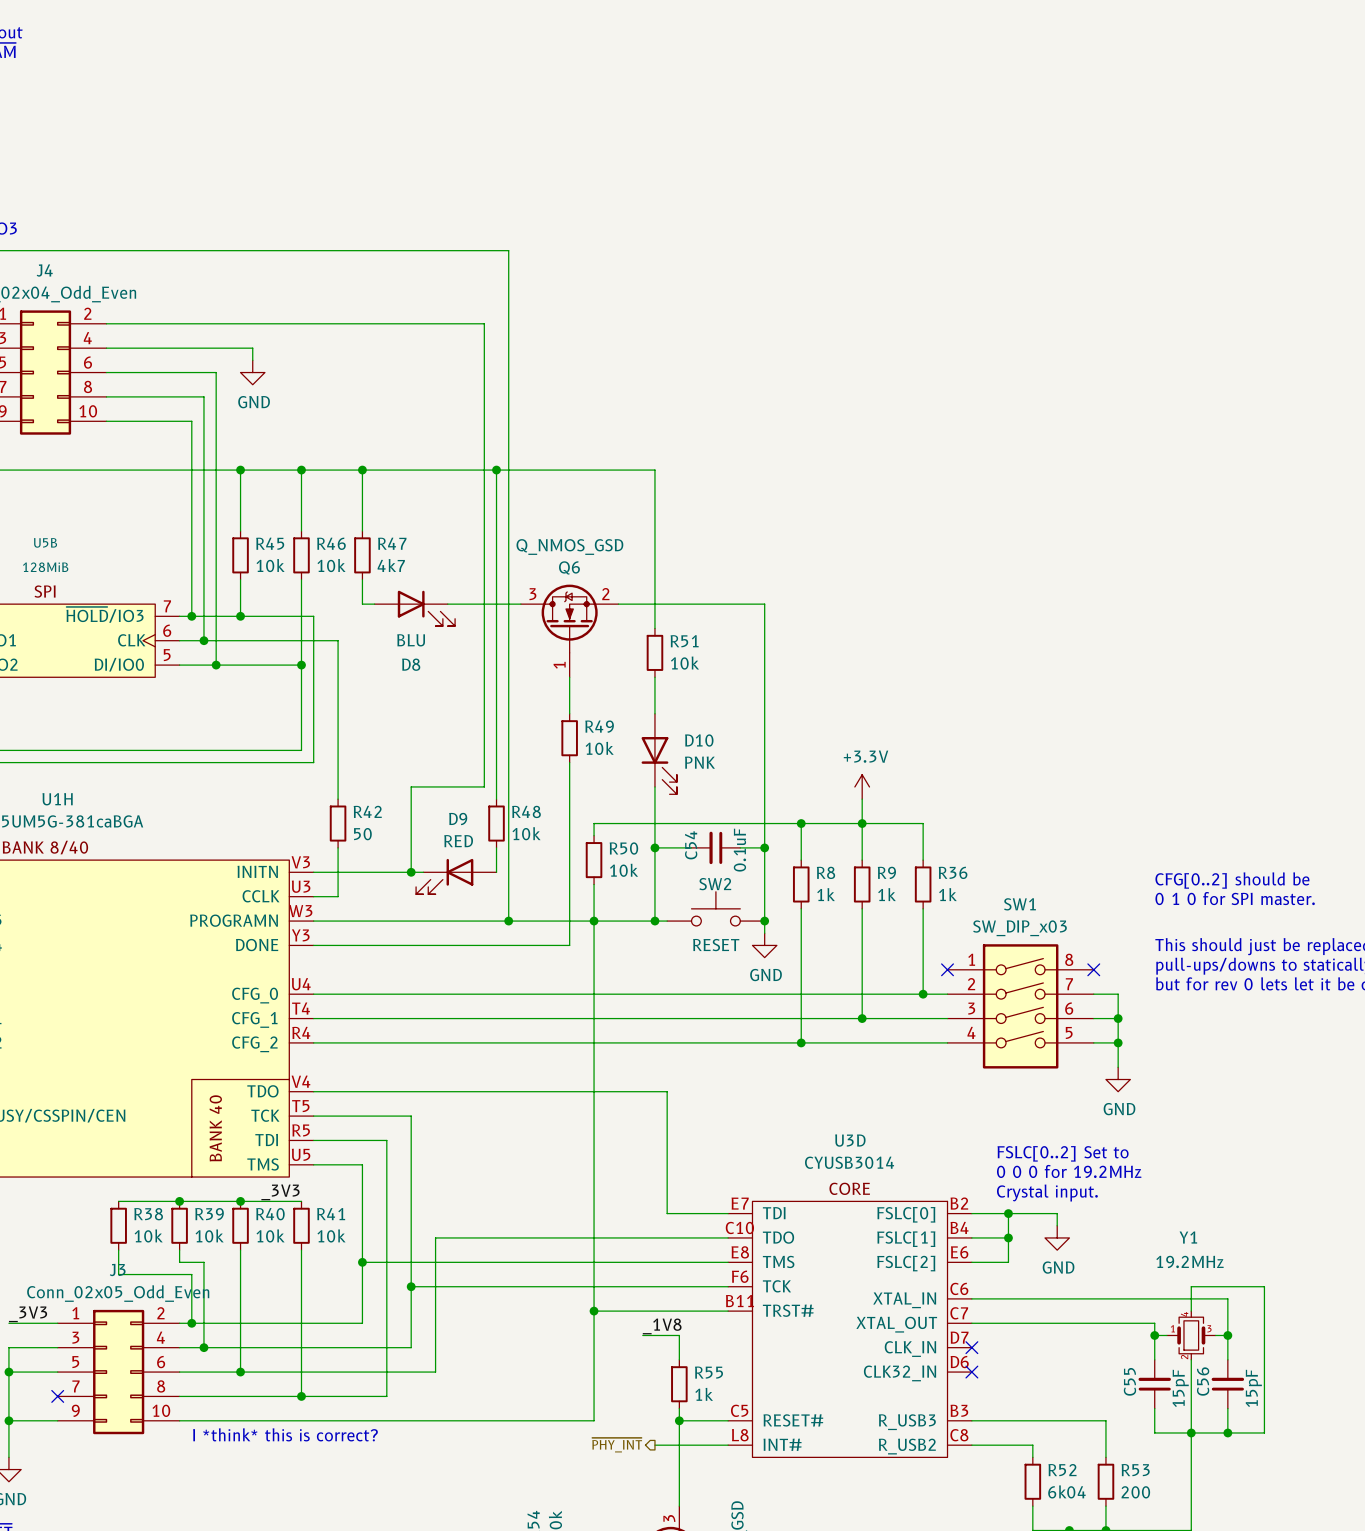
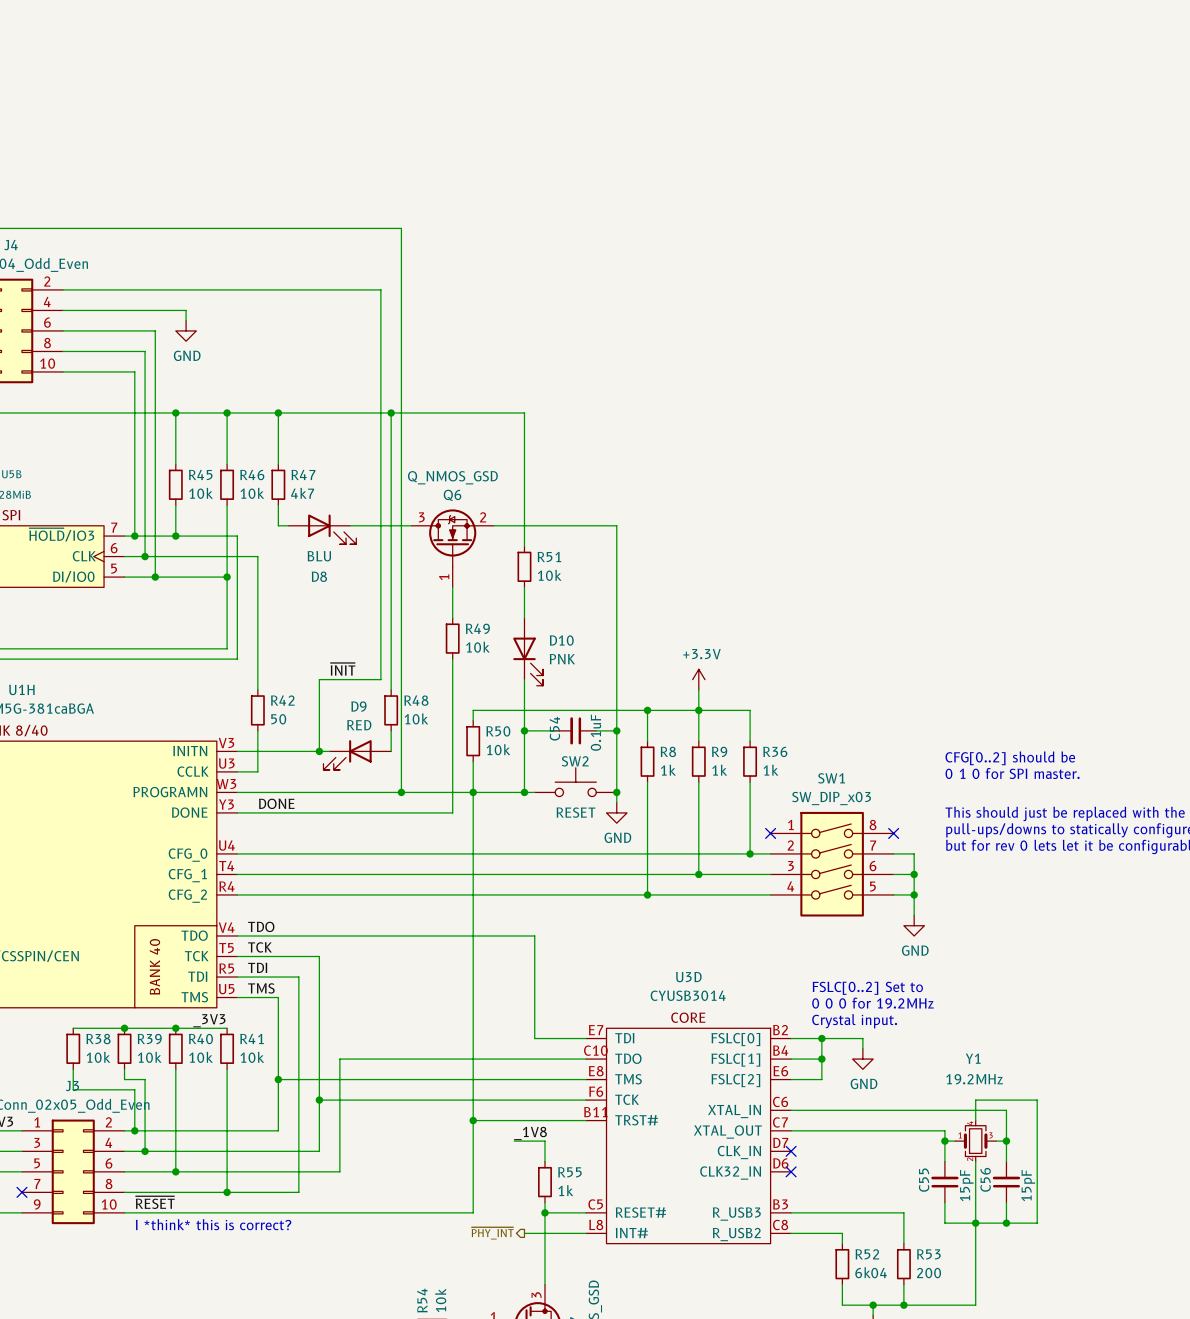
label: none -> ~{INIT} (343, 669)
label: none -> DONE (276, 803)
label: none -> TDO (261, 926)
label: none -> TCK (259, 947)
label: none -> TDI (257, 967)
label: none -> TMS (261, 988)
label: none -> ~{RESET} (155, 1202)

